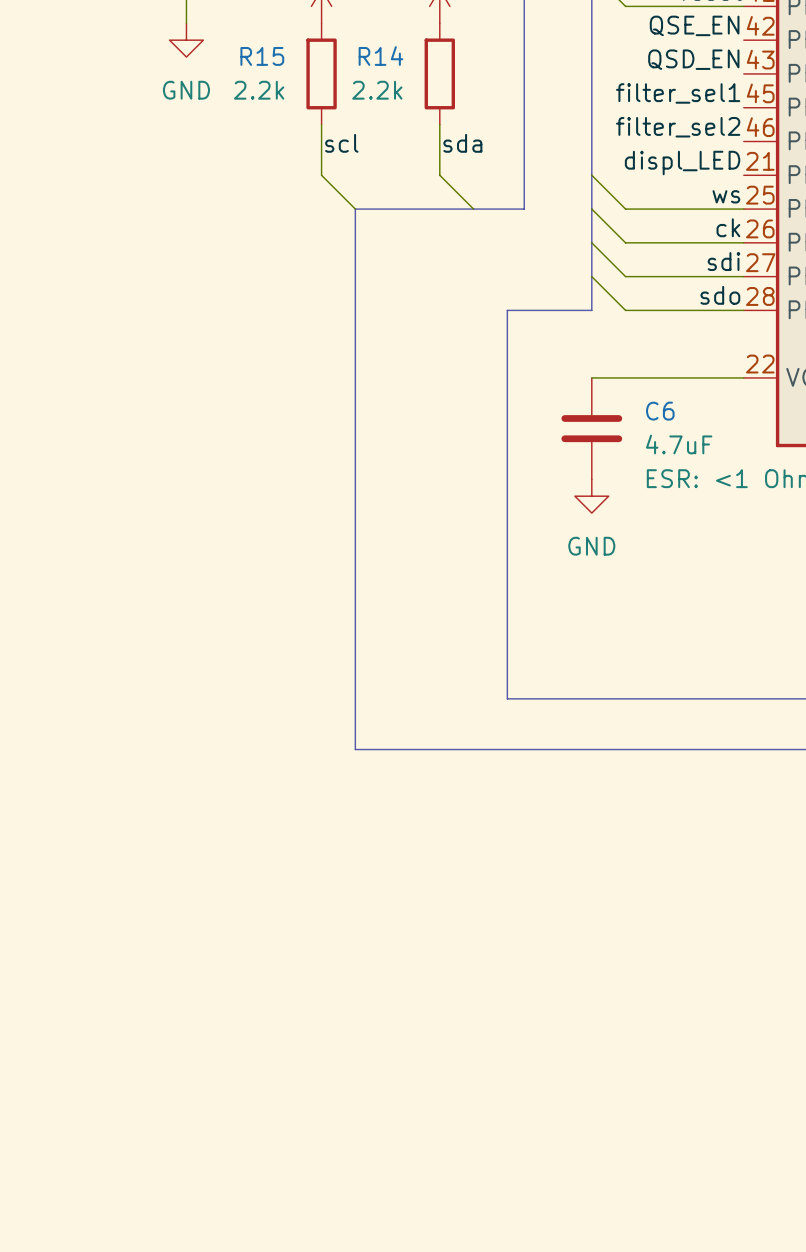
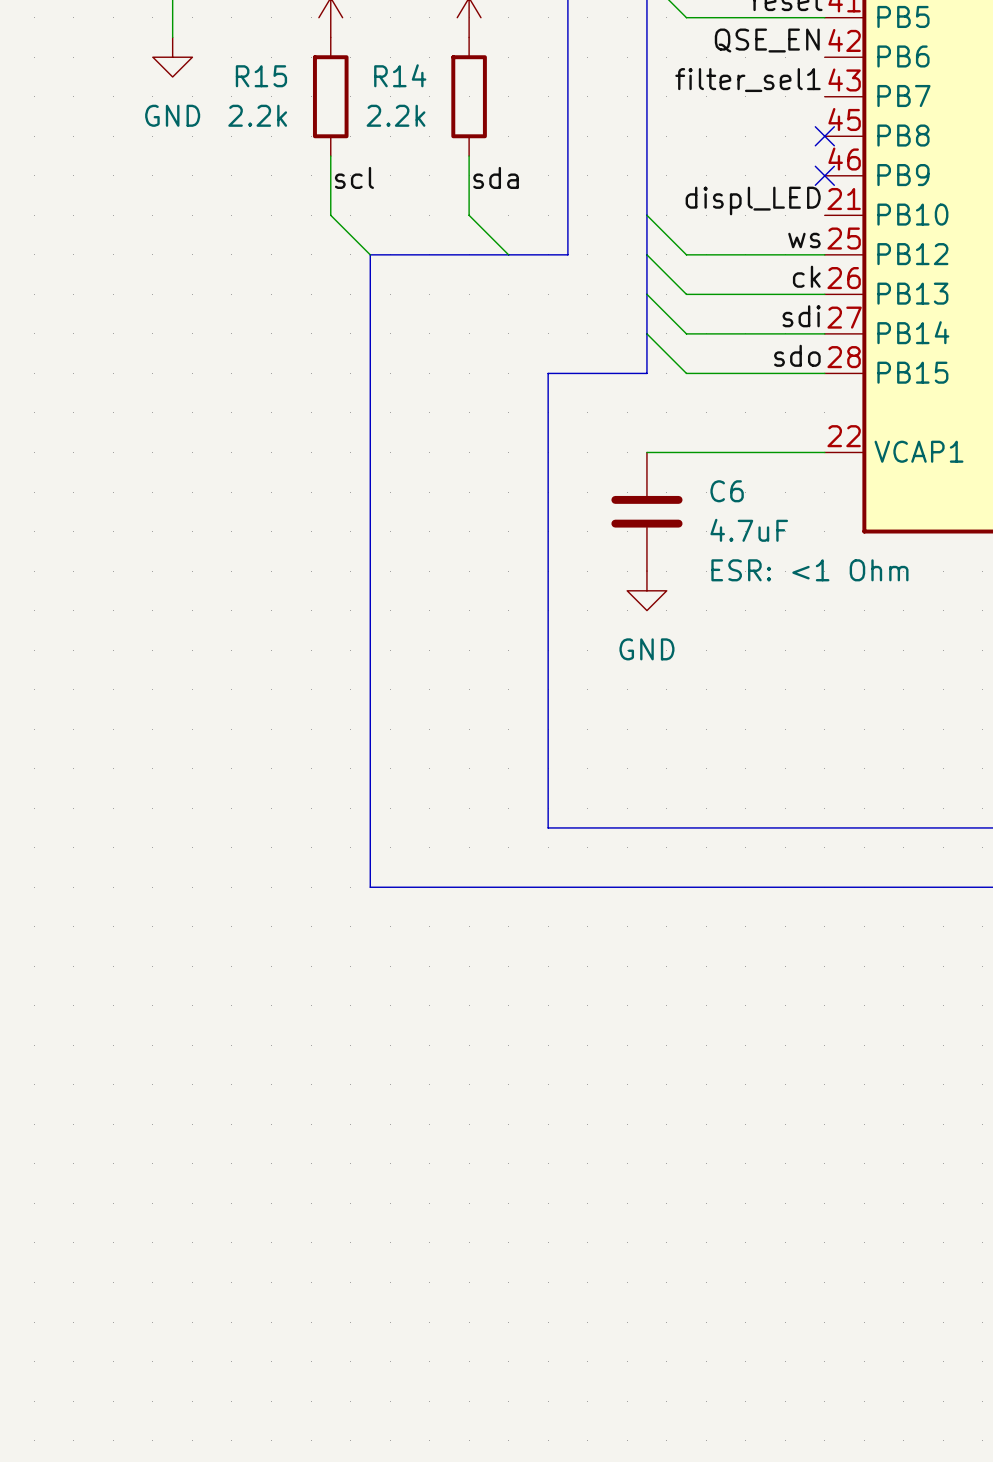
label: QSD_EN (693, 59) -> filter_sel1 (747, 80)
label: filter_sel1 (678, 93) -> none
no-connect mark: none -> (824, 136)
label: filter_sel2 (678, 127) -> none
no-connect mark: none -> (824, 175)

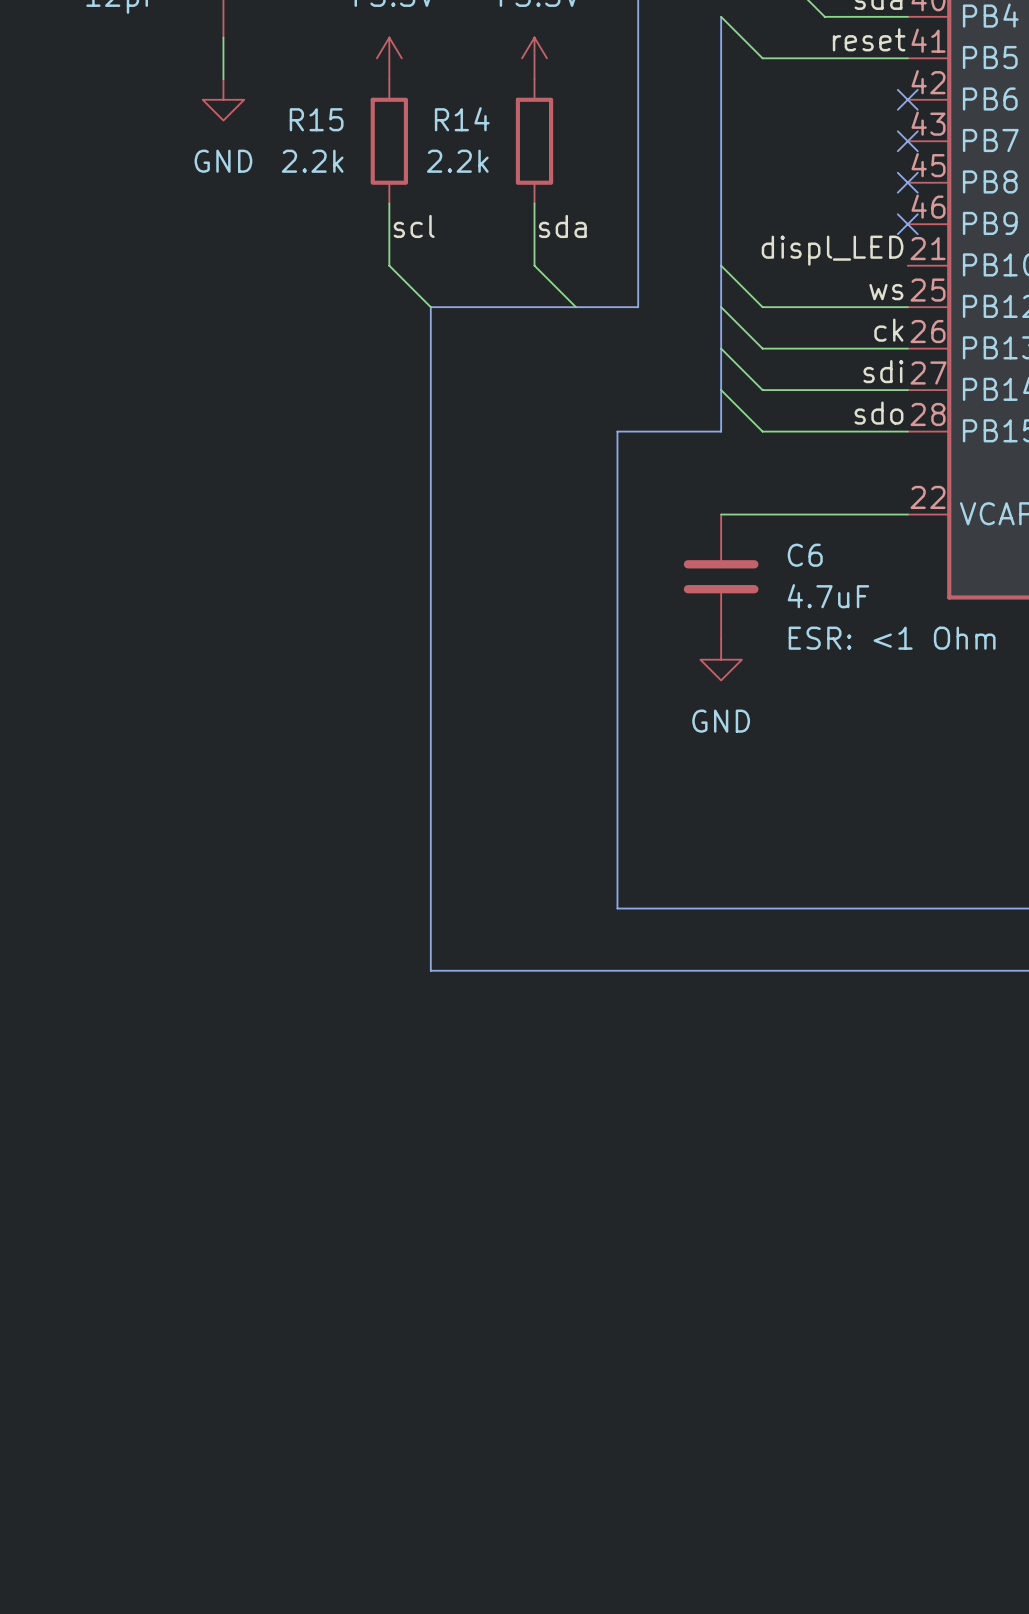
label: QSE_EN (767, 40) -> none
no-connect mark: none -> (907, 99)
label: filter_sel1 (747, 80) -> none
no-connect mark: none -> (907, 141)

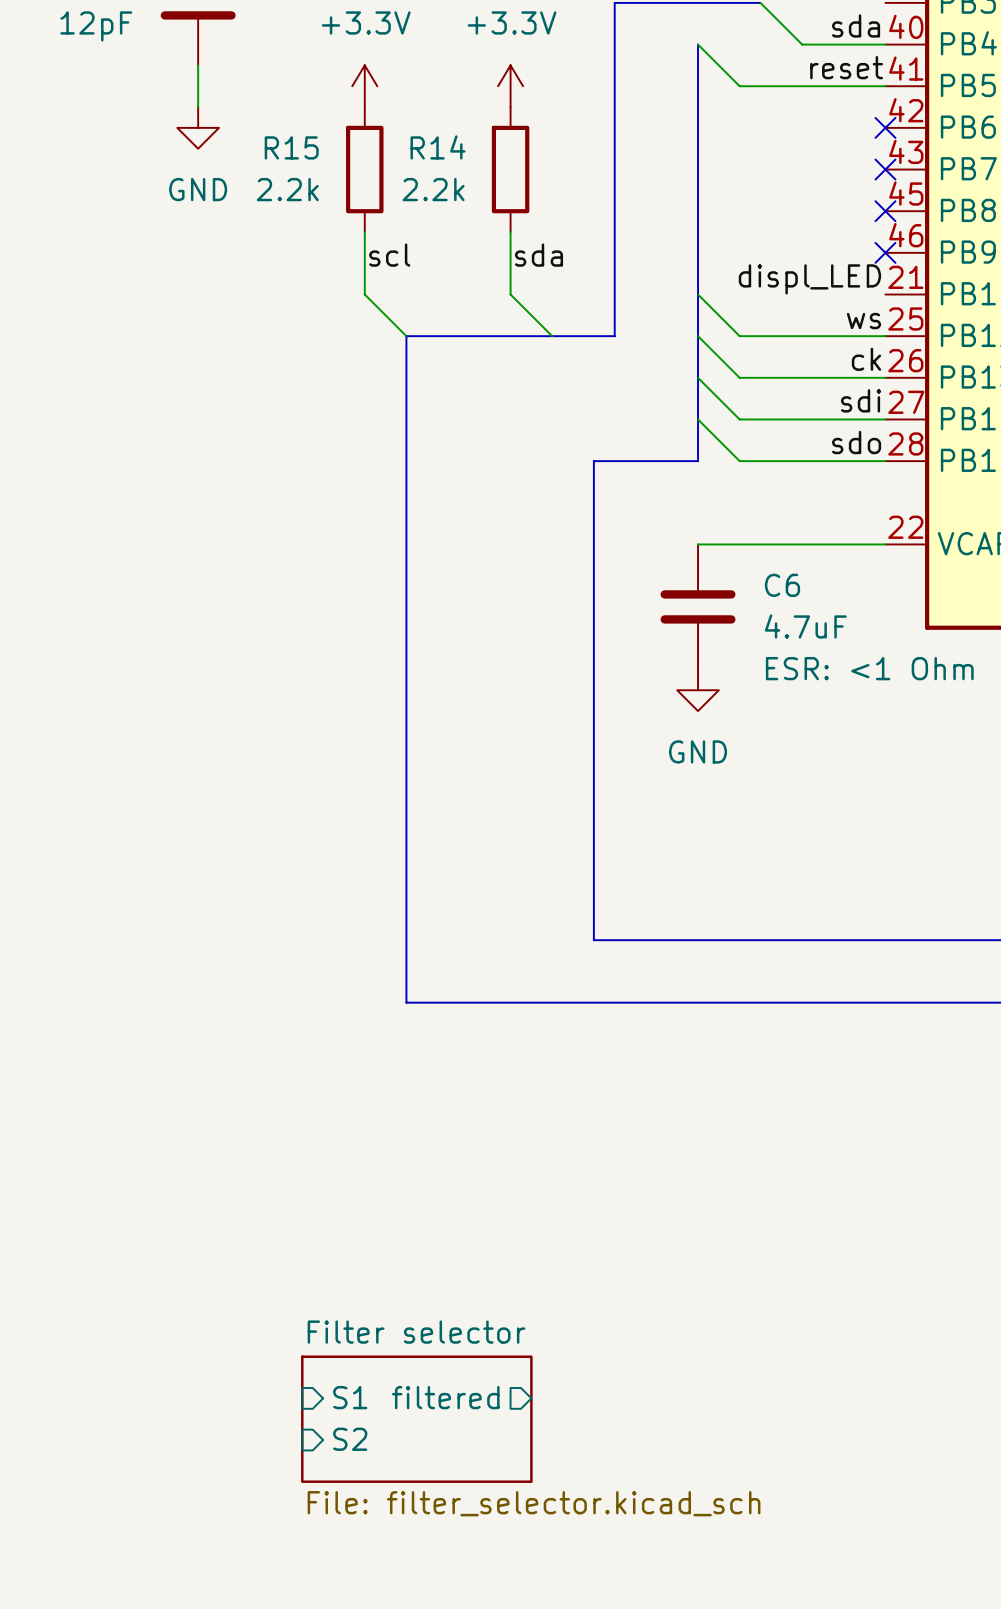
sheet pin: none -> S1 (350, 1397)
sheet pin: none -> filtered (445, 1397)
sheet Filter selector: none -> File: filter_selector.kicad_sch (416, 1419)
sheet pin: none -> S2 (350, 1439)

